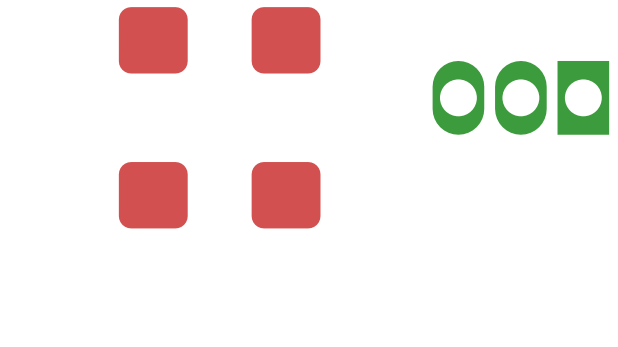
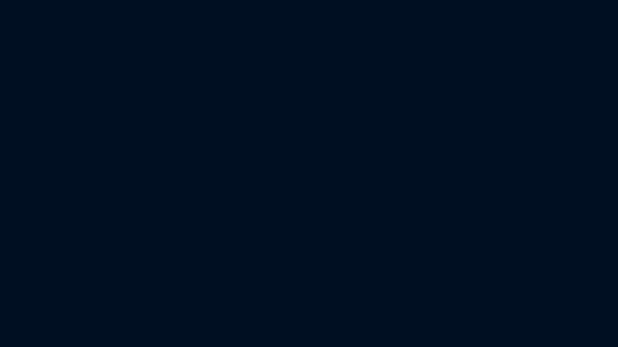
part: (219, 40) -> none
part: (520, 97) -> none
part: (219, 195) -> none

